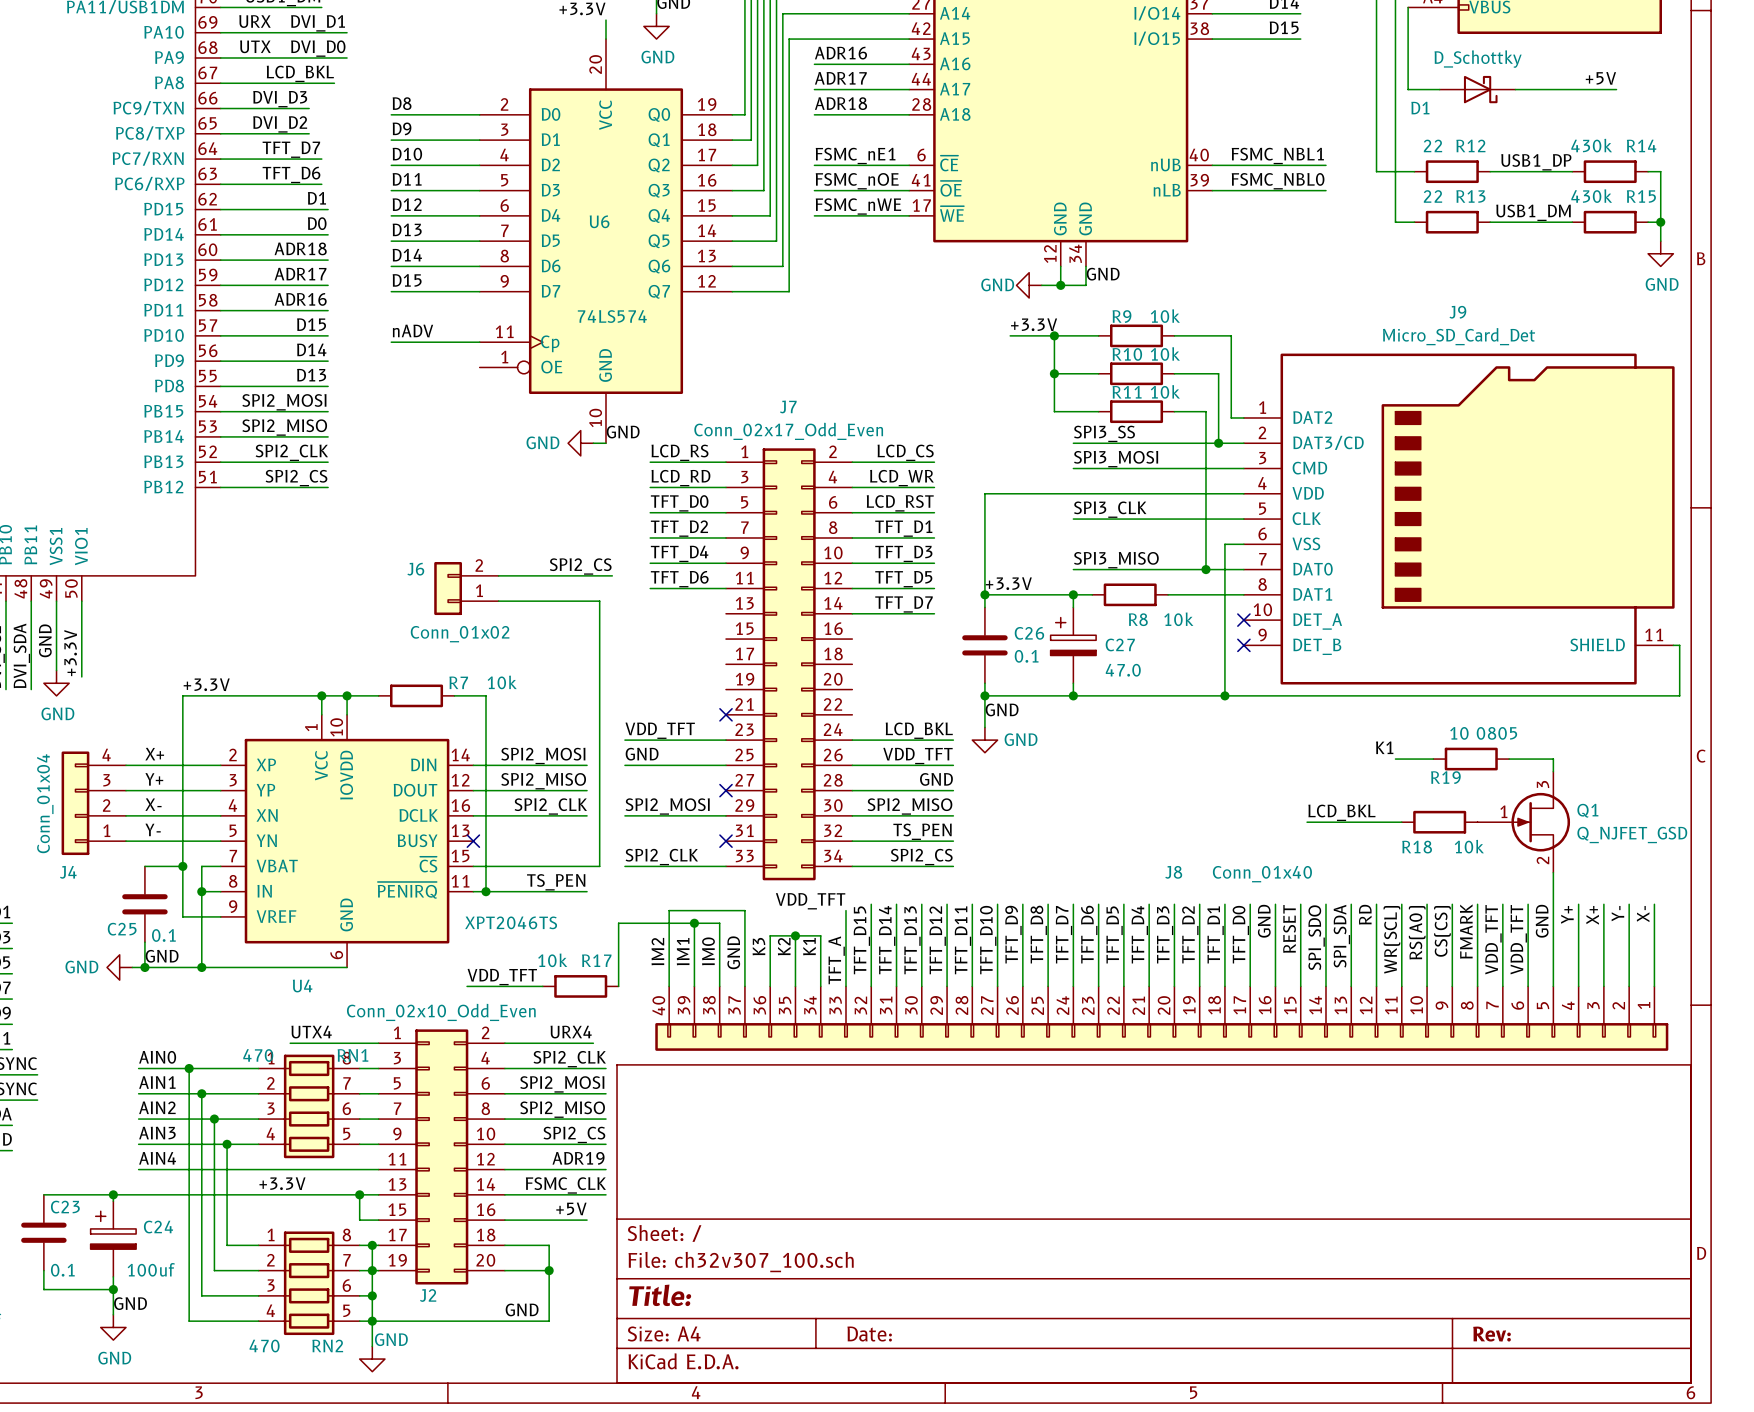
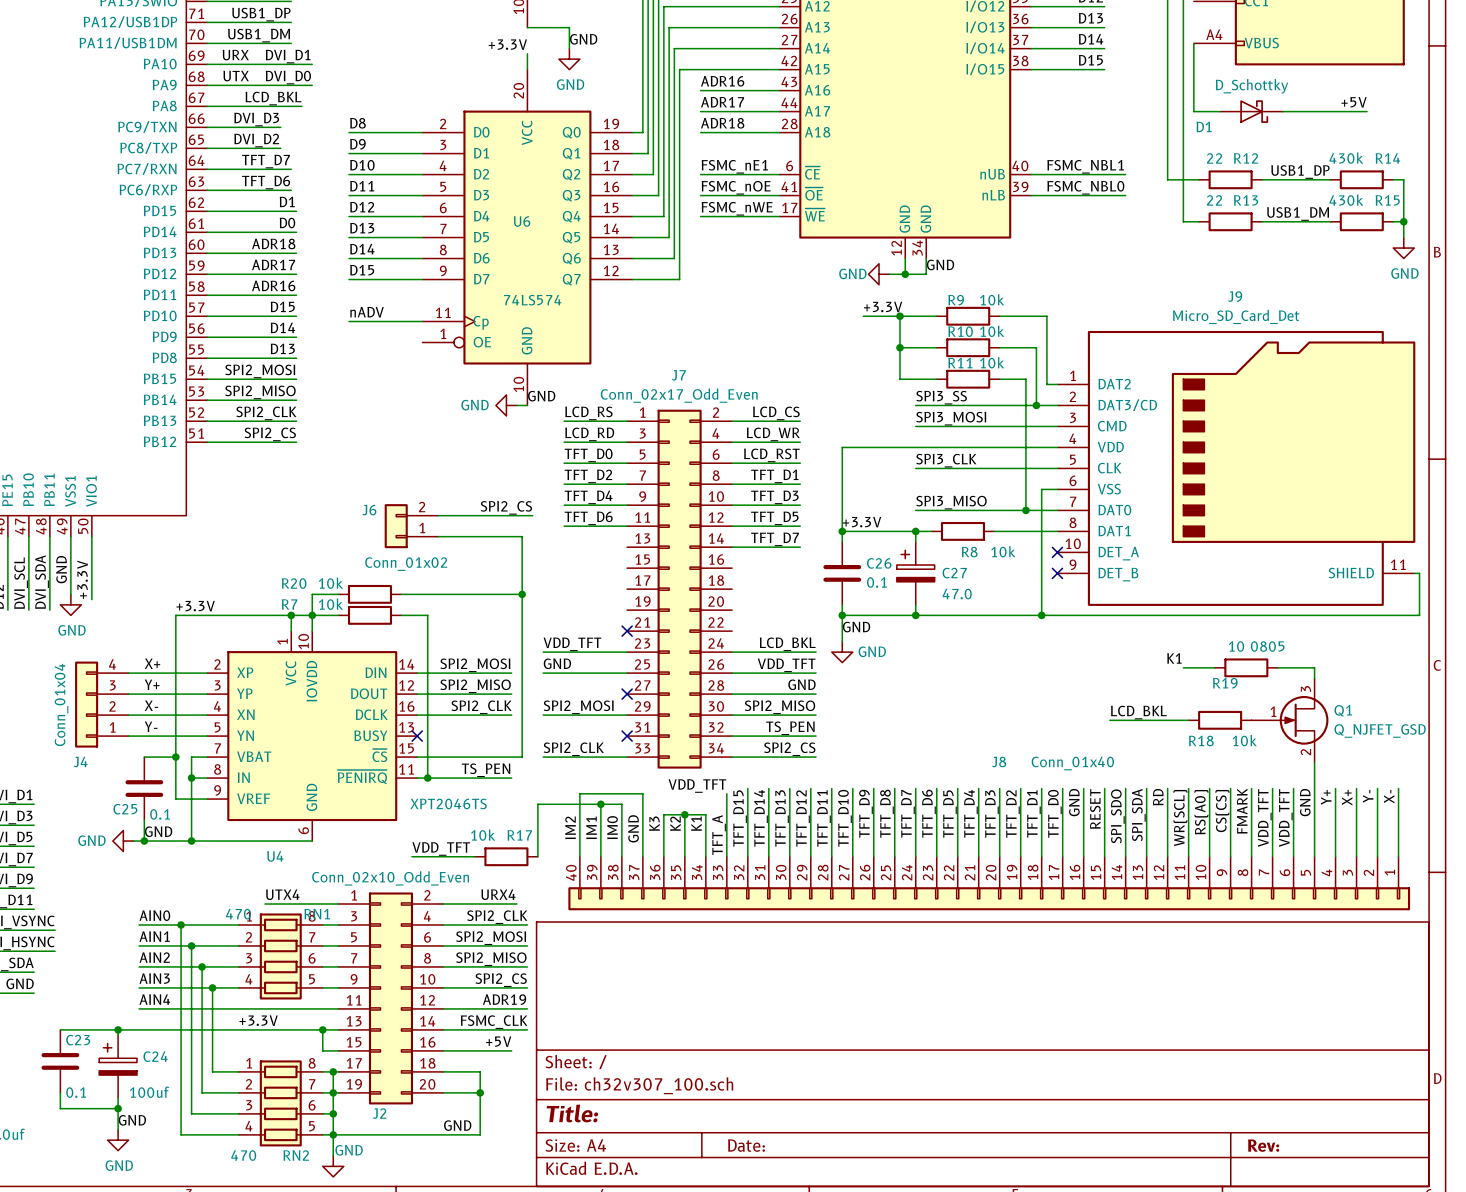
wire: none -> (338, 594) (312, 594) (312, 615)
R20: none -> 10k (369, 594)
wire: none -> (401, 594) (522, 594)
junction: none -> (522, 594)
R7 name position: R7 (458, 682) -> R7 (289, 604)
R7 value position: 10k (502, 682) -> 10k (330, 604)

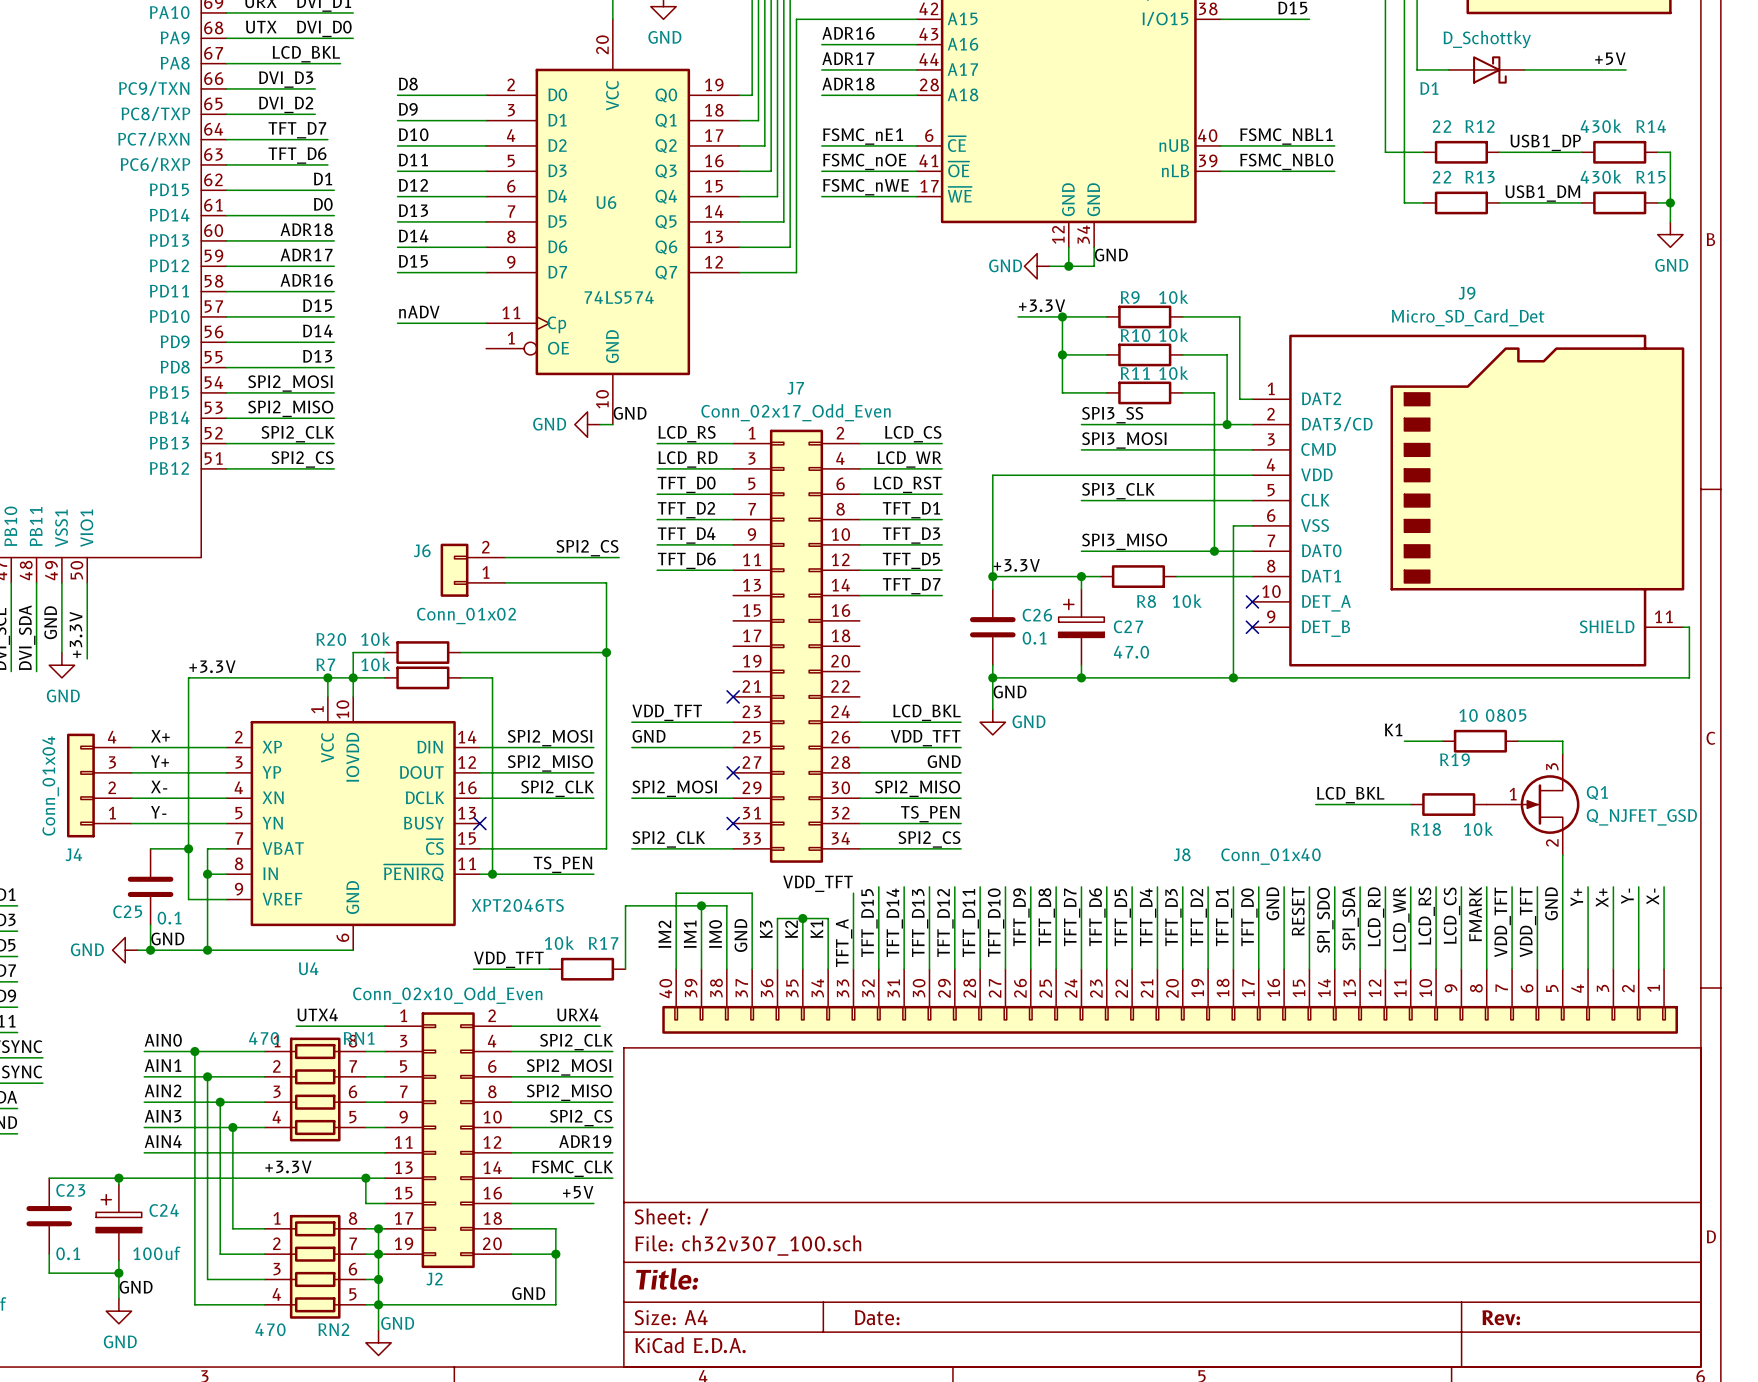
label: RD (1158, 797) -> LCD_RD (1376, 916)
label: CS(CS) (1222, 811) -> LCD_CS (1452, 915)
label: RS(A0) (1201, 812) -> LCD_RS (1426, 916)
label: WR(SCL) (1180, 818) -> LCD_WR (1401, 919)

